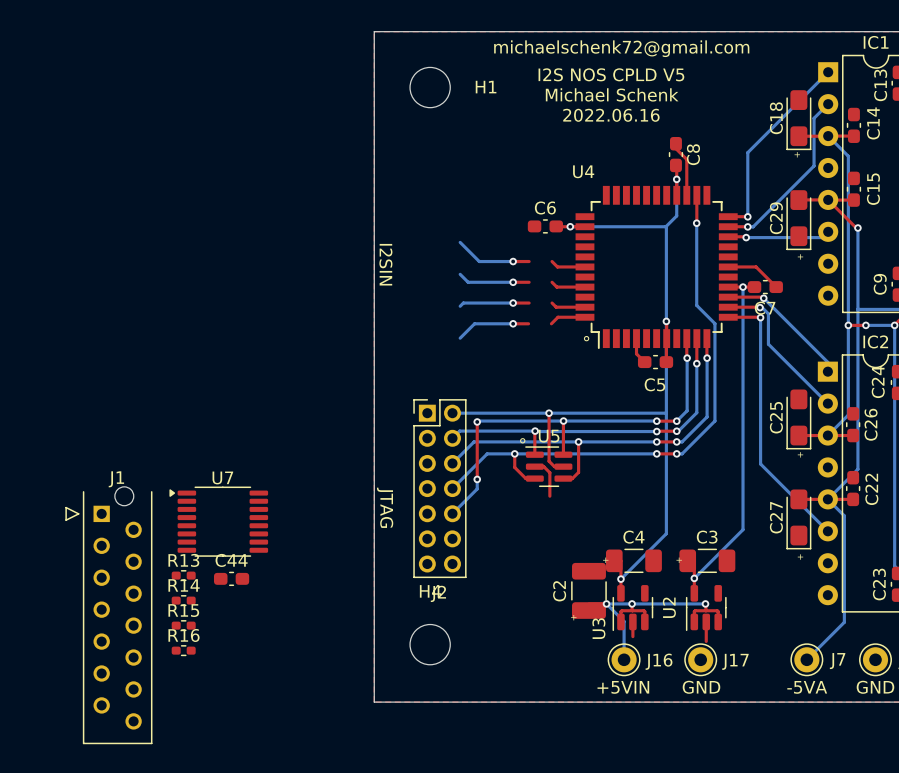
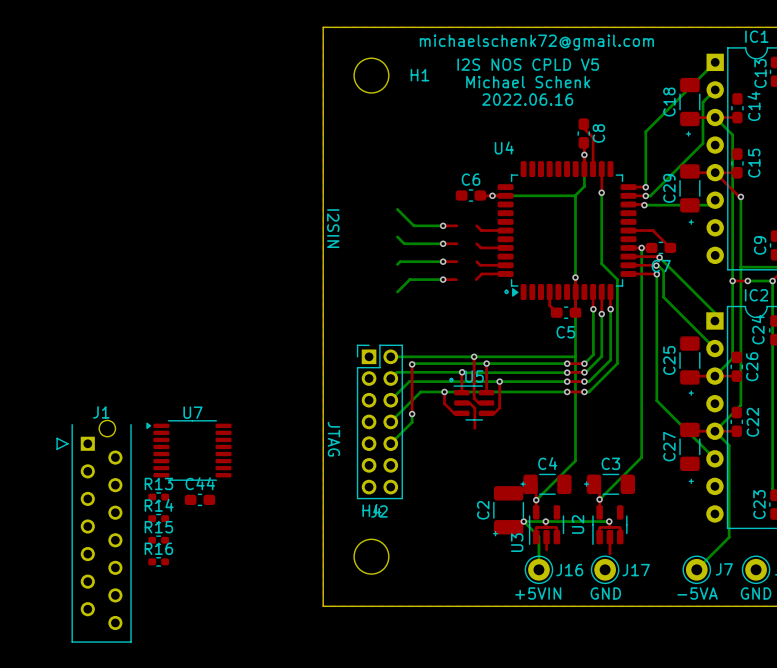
C18 footprint: [786, 90, 812, 151] -> [679, 77, 701, 127]
U4 footprint: [575, 185, 738, 349] -> [497, 161, 637, 301]
C29 footprint: [786, 190, 812, 251] -> [679, 164, 701, 213]
C25 footprint: [786, 389, 812, 450] -> [679, 336, 701, 385]
C27 footprint: [786, 489, 812, 550] -> [679, 422, 701, 472]

